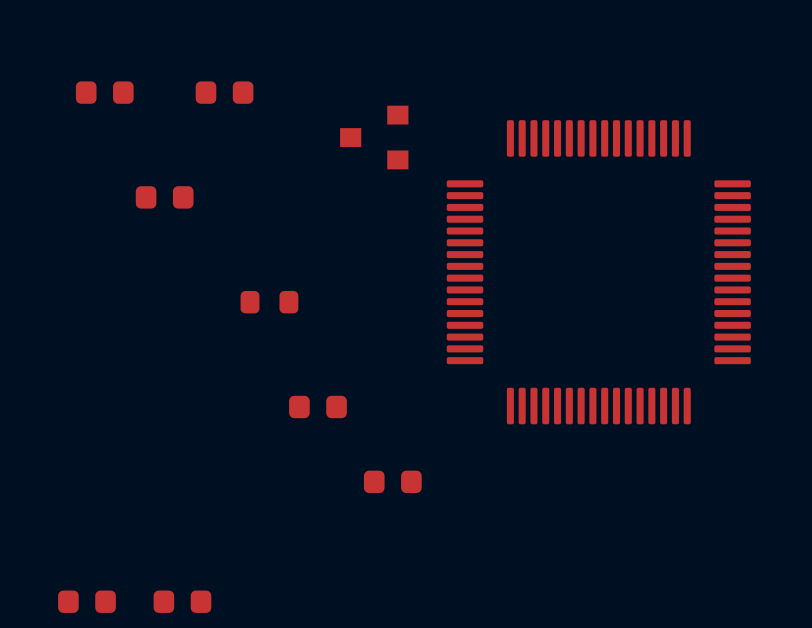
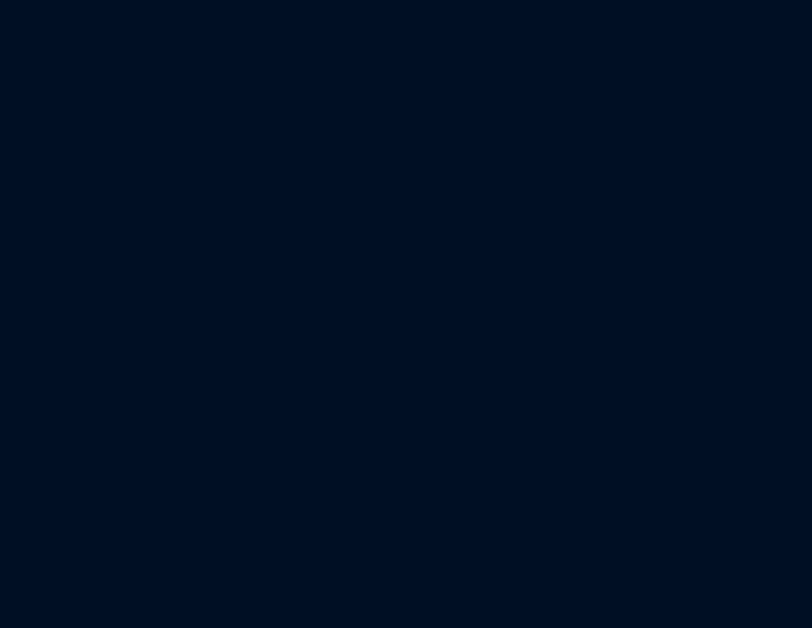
part: (104, 92) -> none
part: (224, 92) -> none
part: (374, 137) -> none
part: (164, 197) -> none
part: (598, 272) -> none
part: (269, 302) -> none
part: (317, 406) -> none
part: (392, 481) -> none
part: (86, 601) -> none
part: (182, 601) -> none

